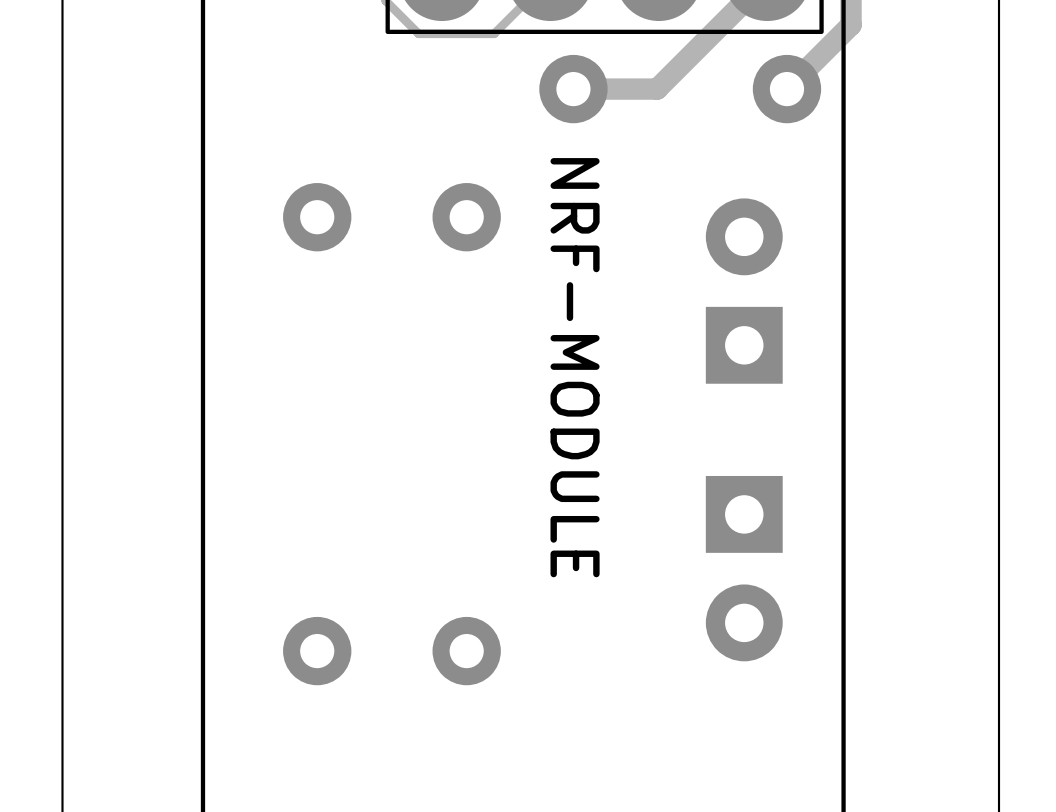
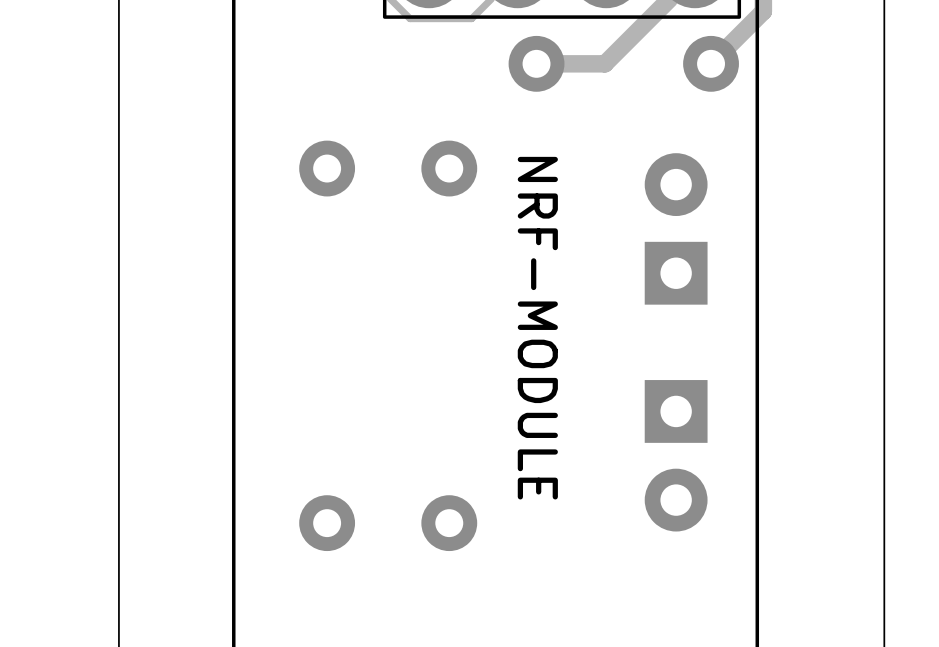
part value position: NRF-MODULE (575, 367) -> NRF-MODULE (537, 328)

